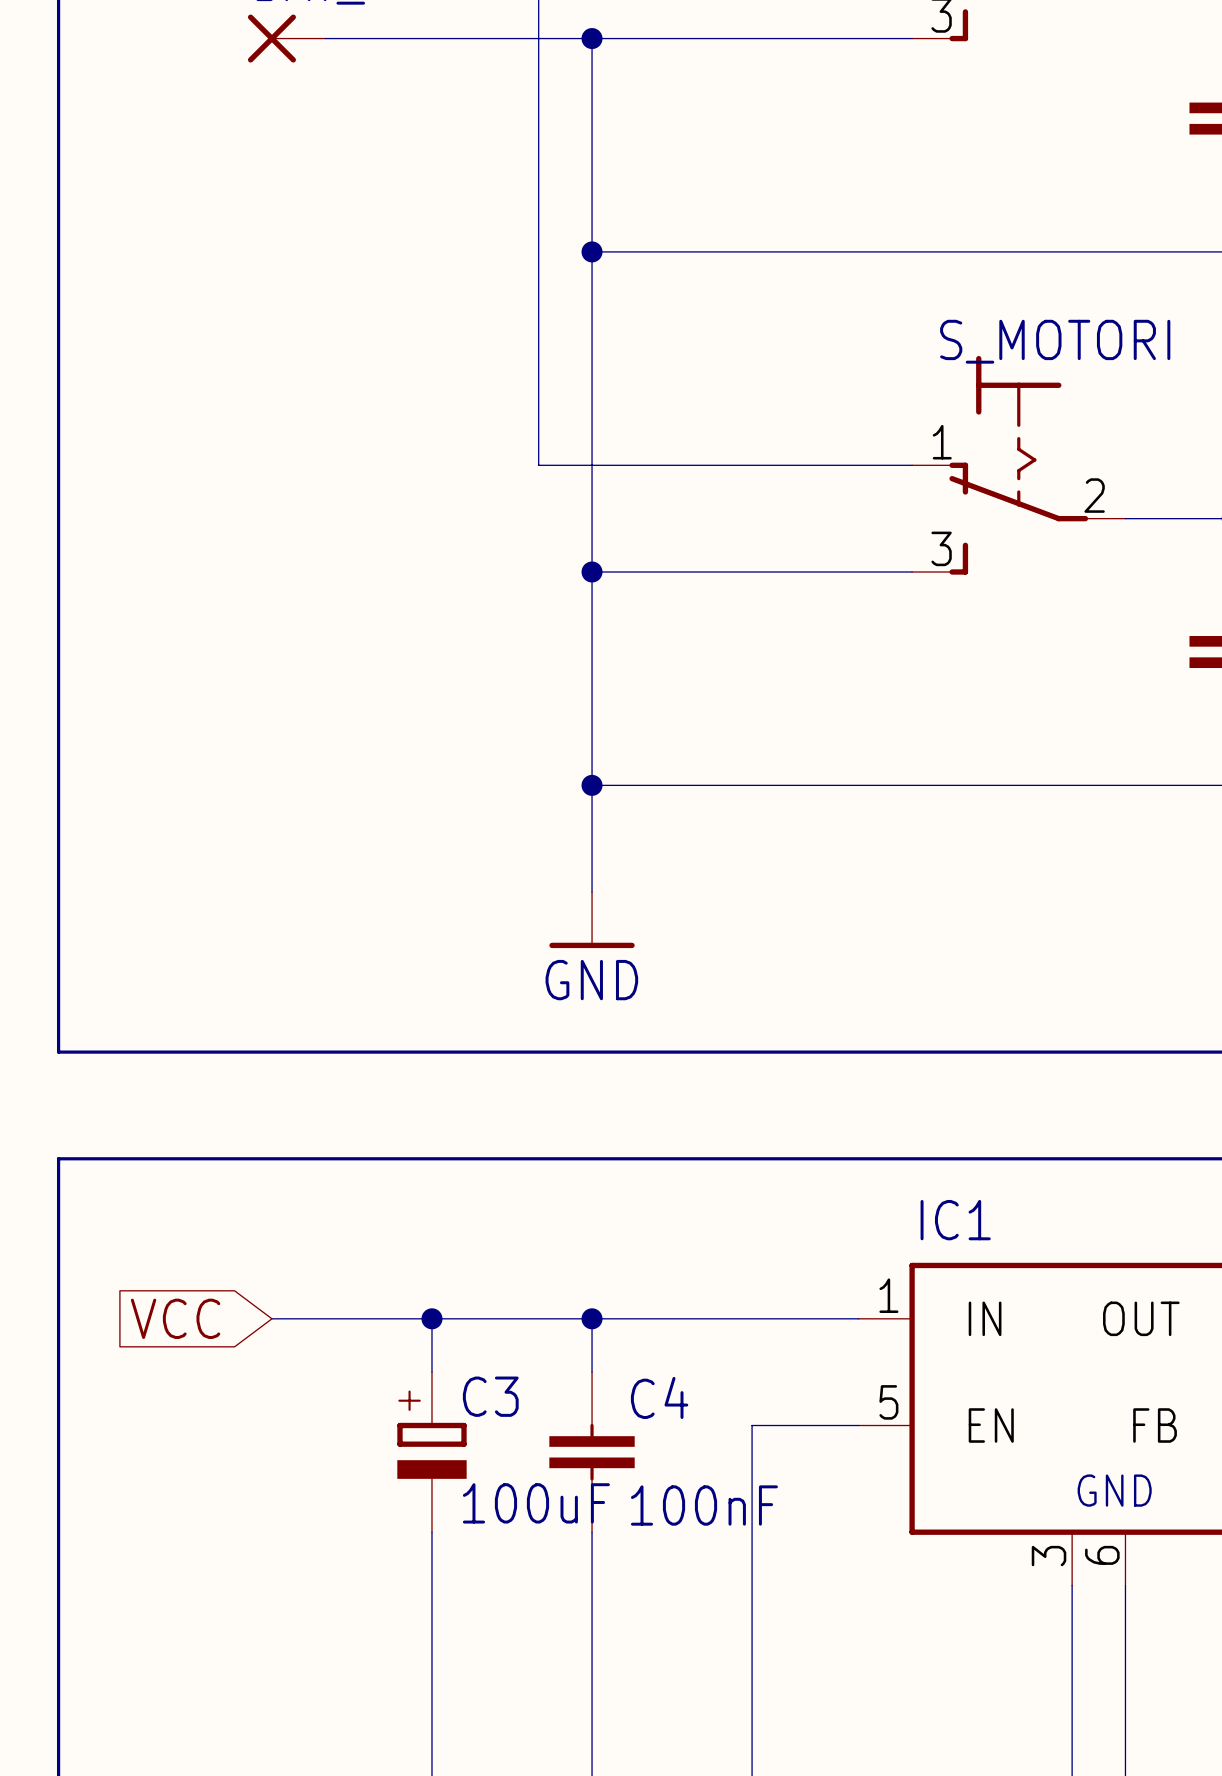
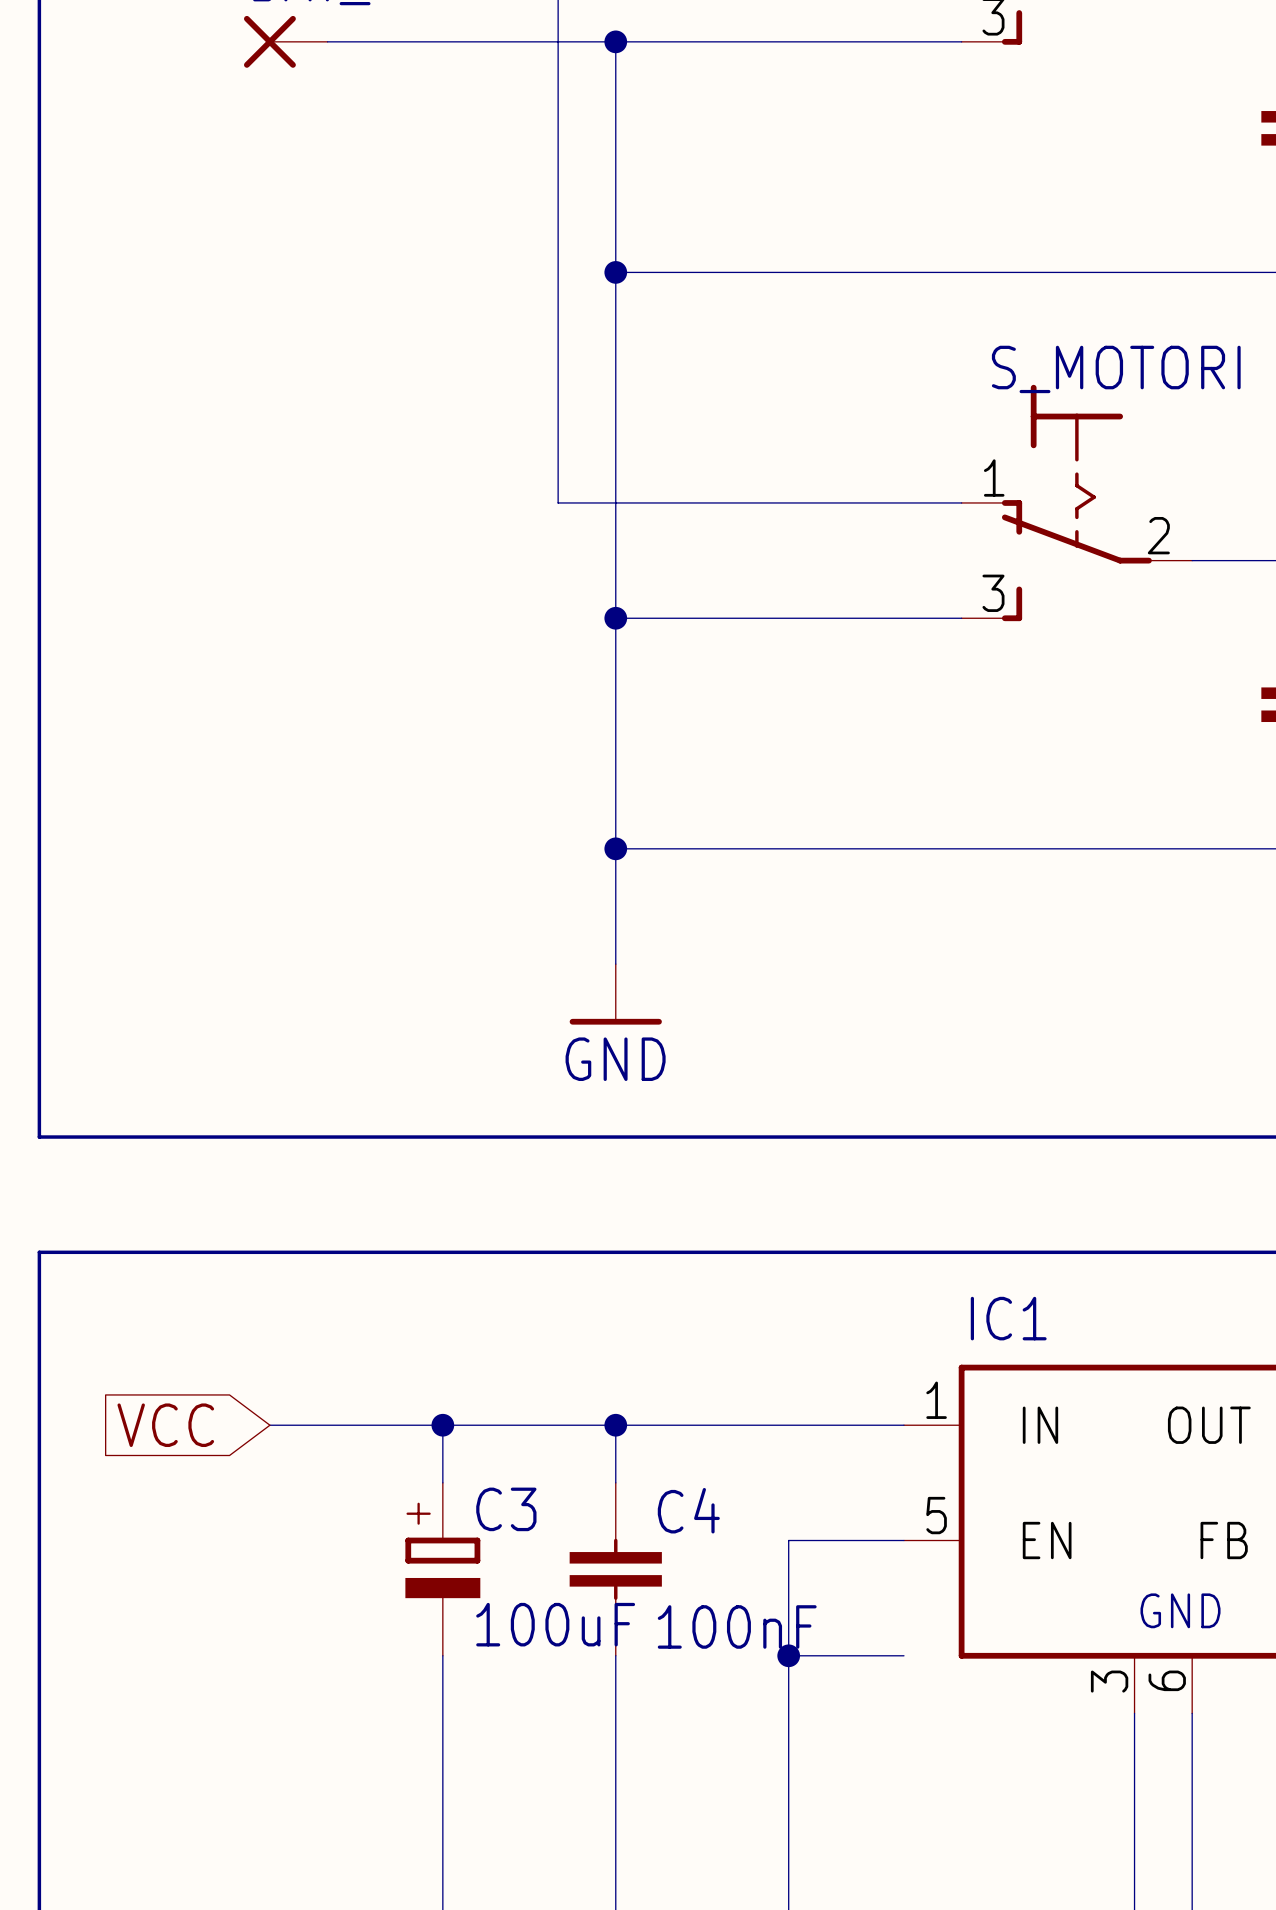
wire: none -> (788, 1655) (903, 1655)
junction: none -> (788, 1655)

